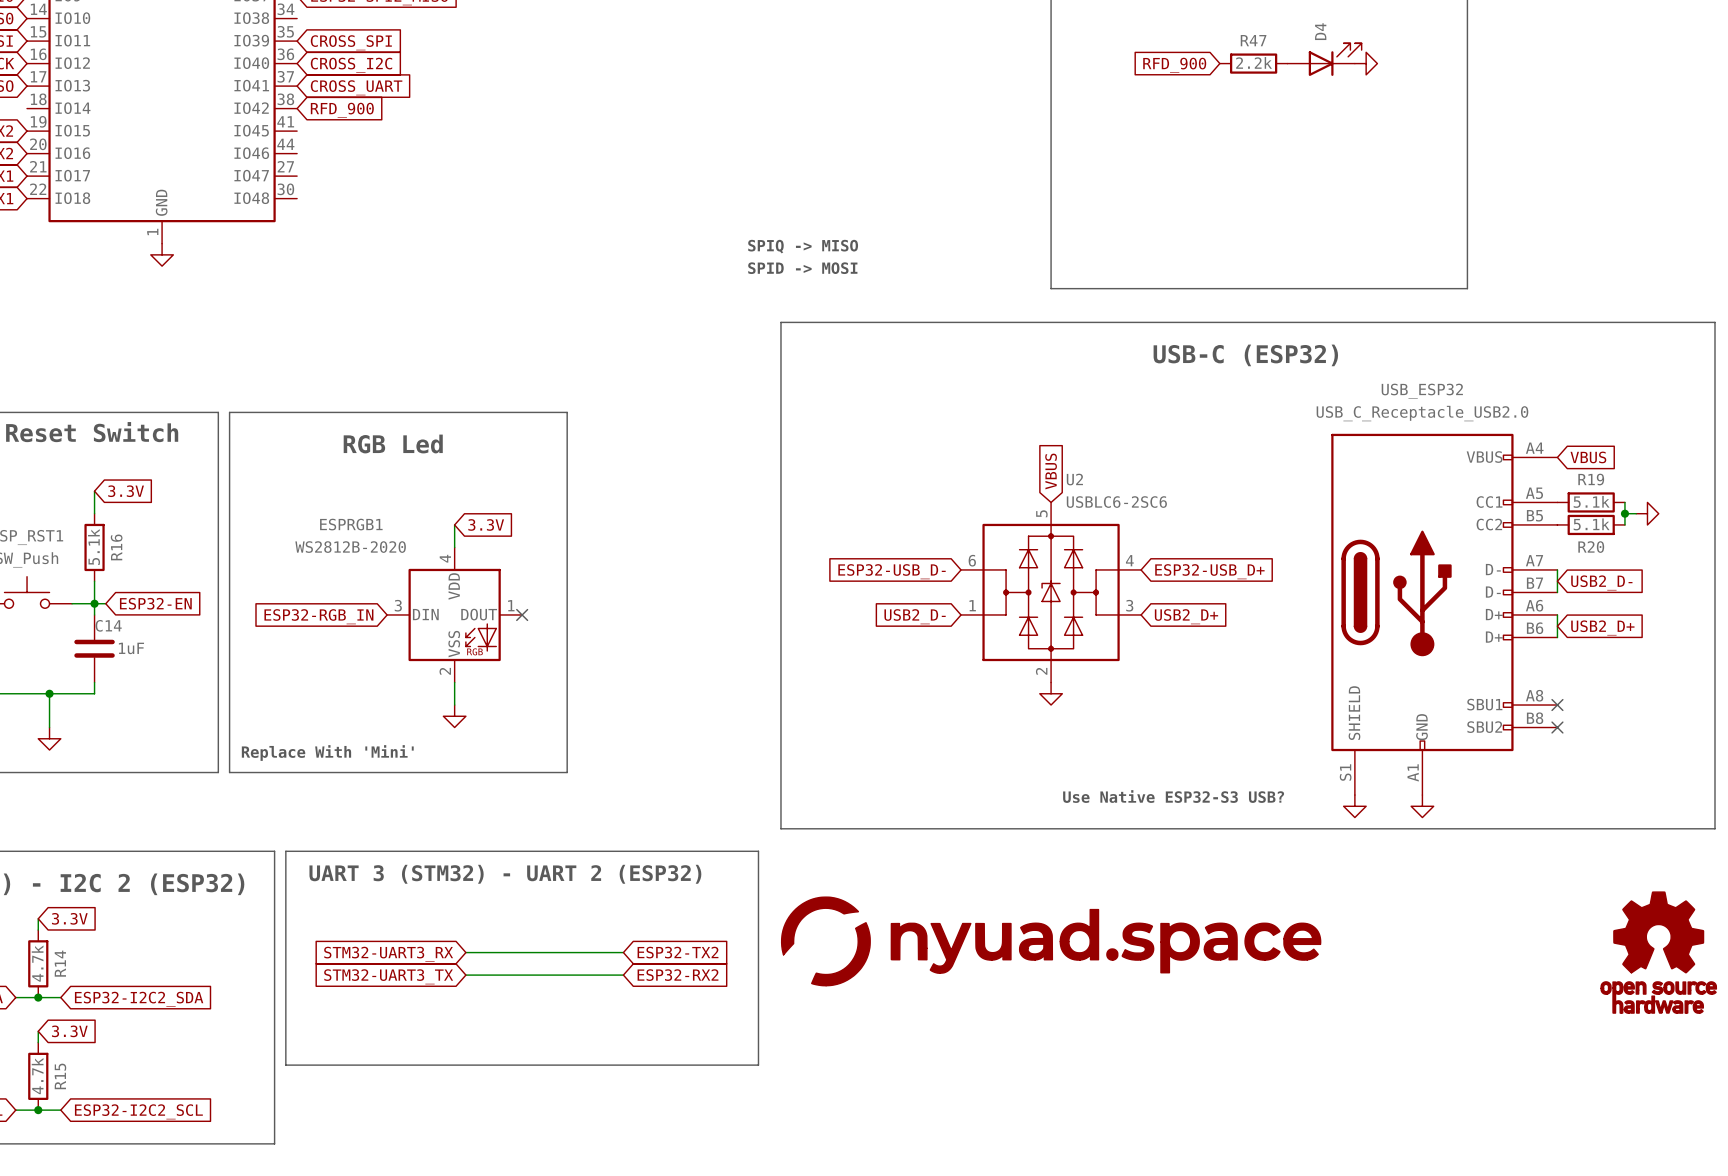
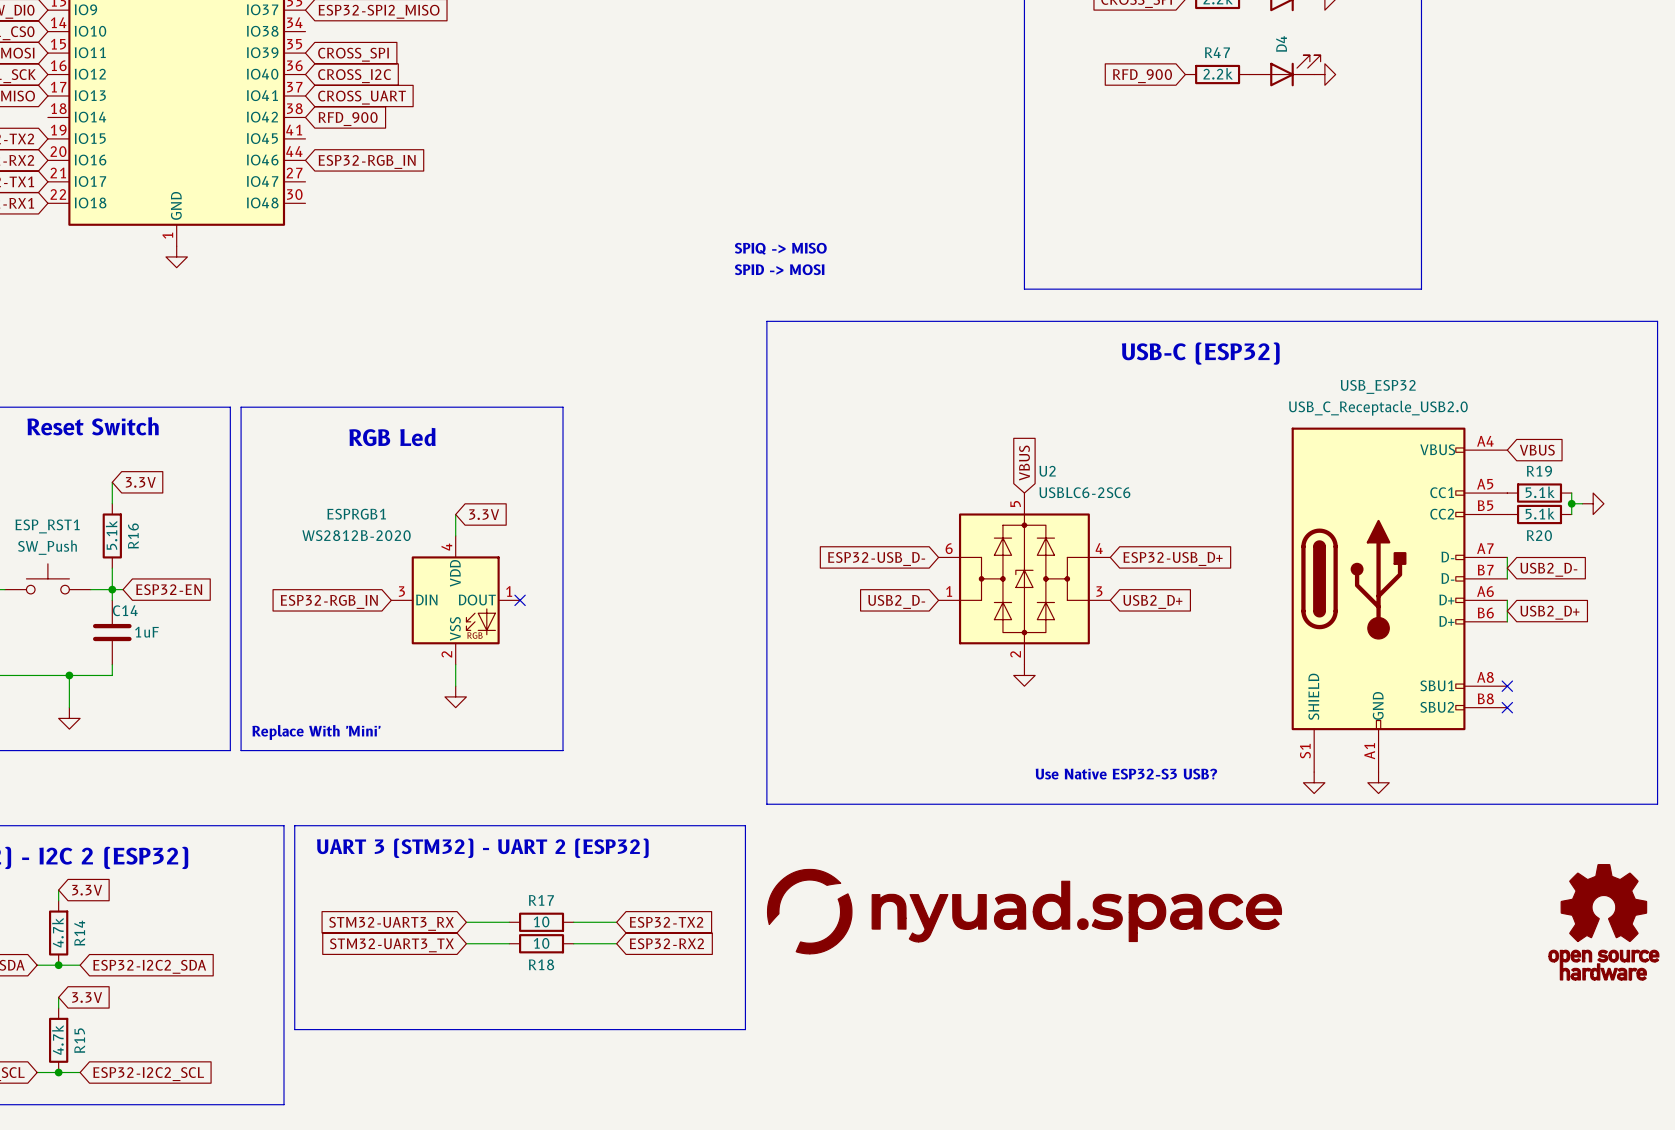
global label: none -> ESP32-RGB_IN (367, 161)
wire: (510, 952) (578, 952) -> none
R17: none -> 10 (541, 922)
wire: (510, 975) (578, 975) -> none
R18: none -> 10 (541, 943)

